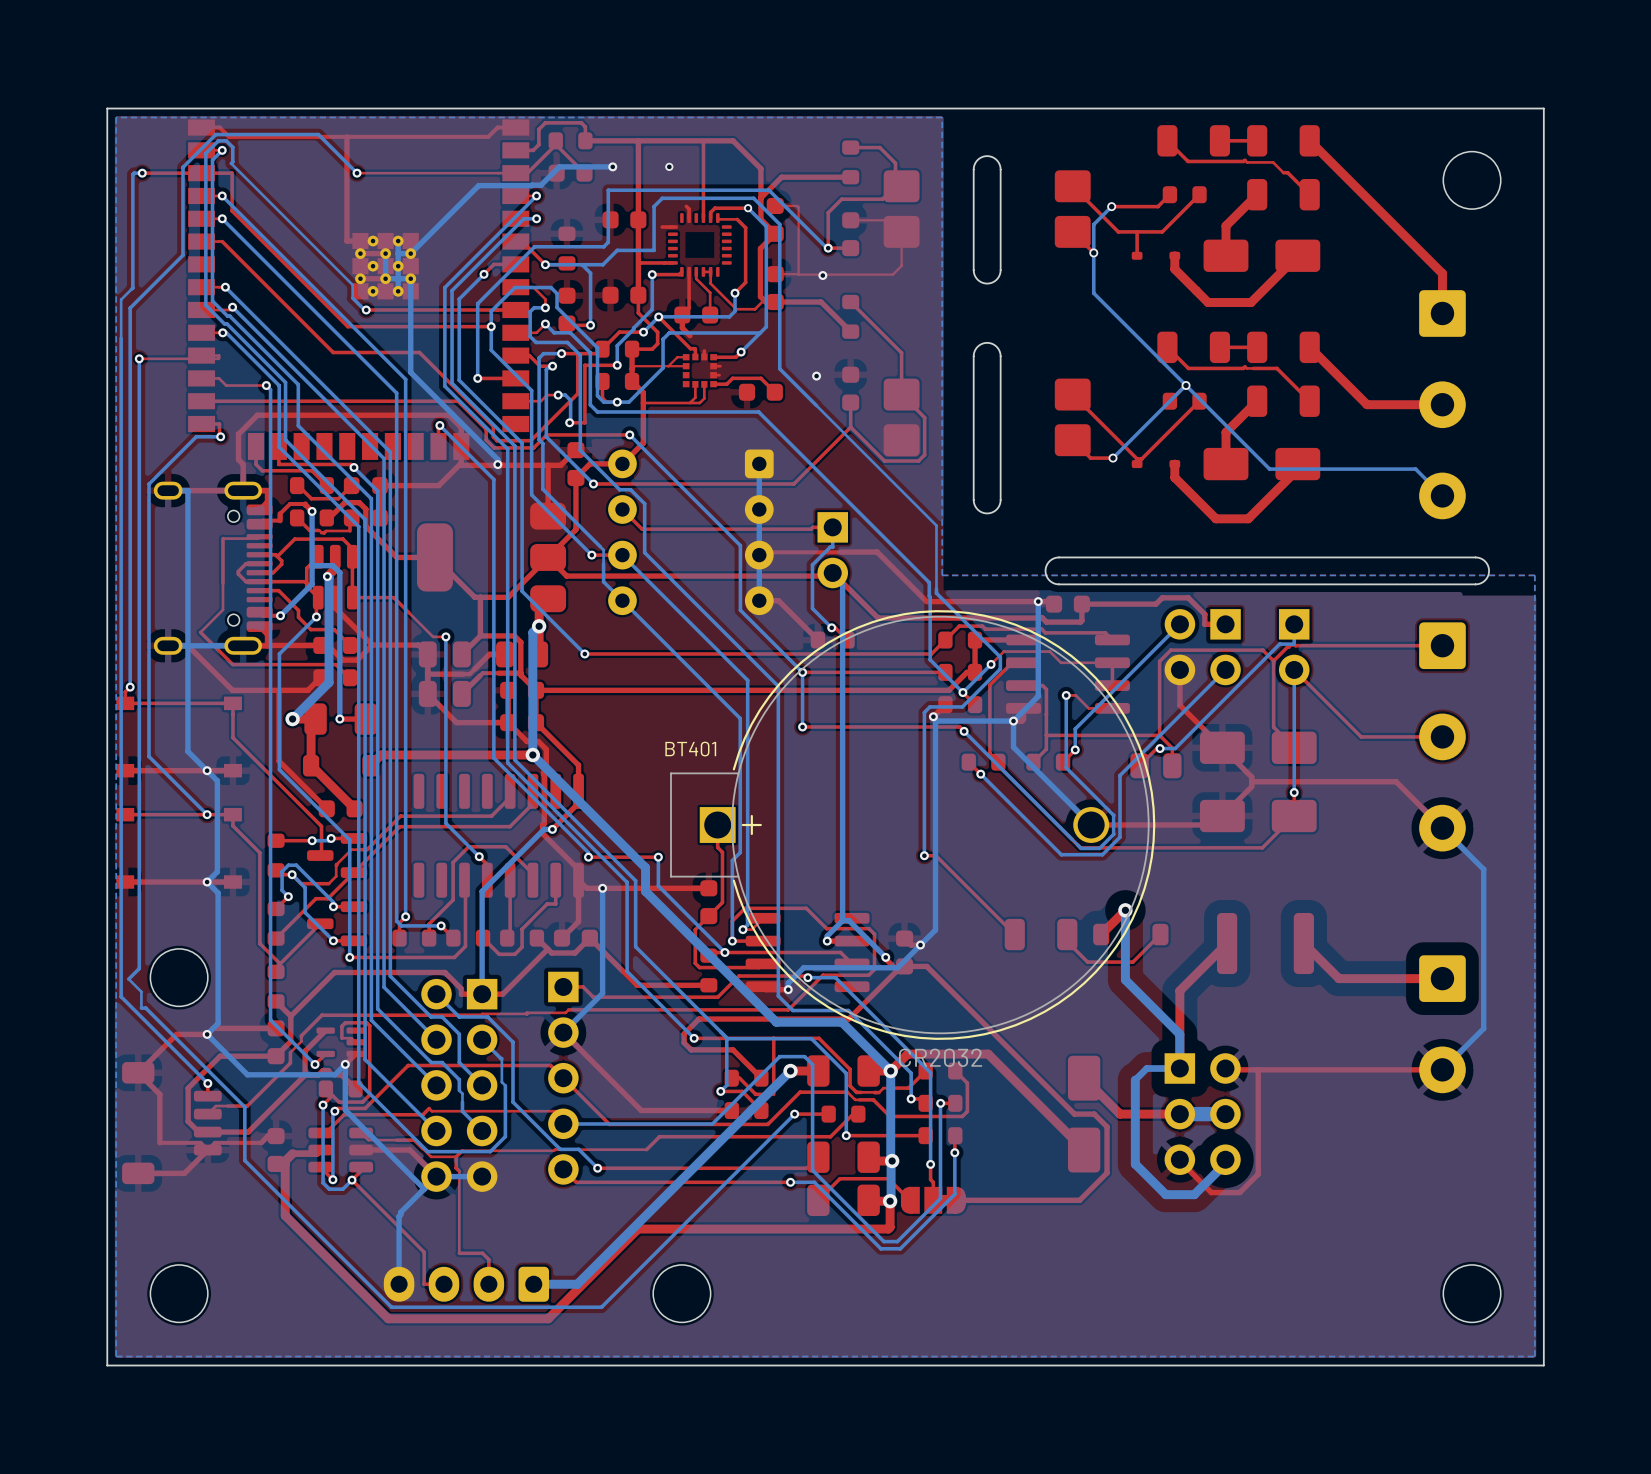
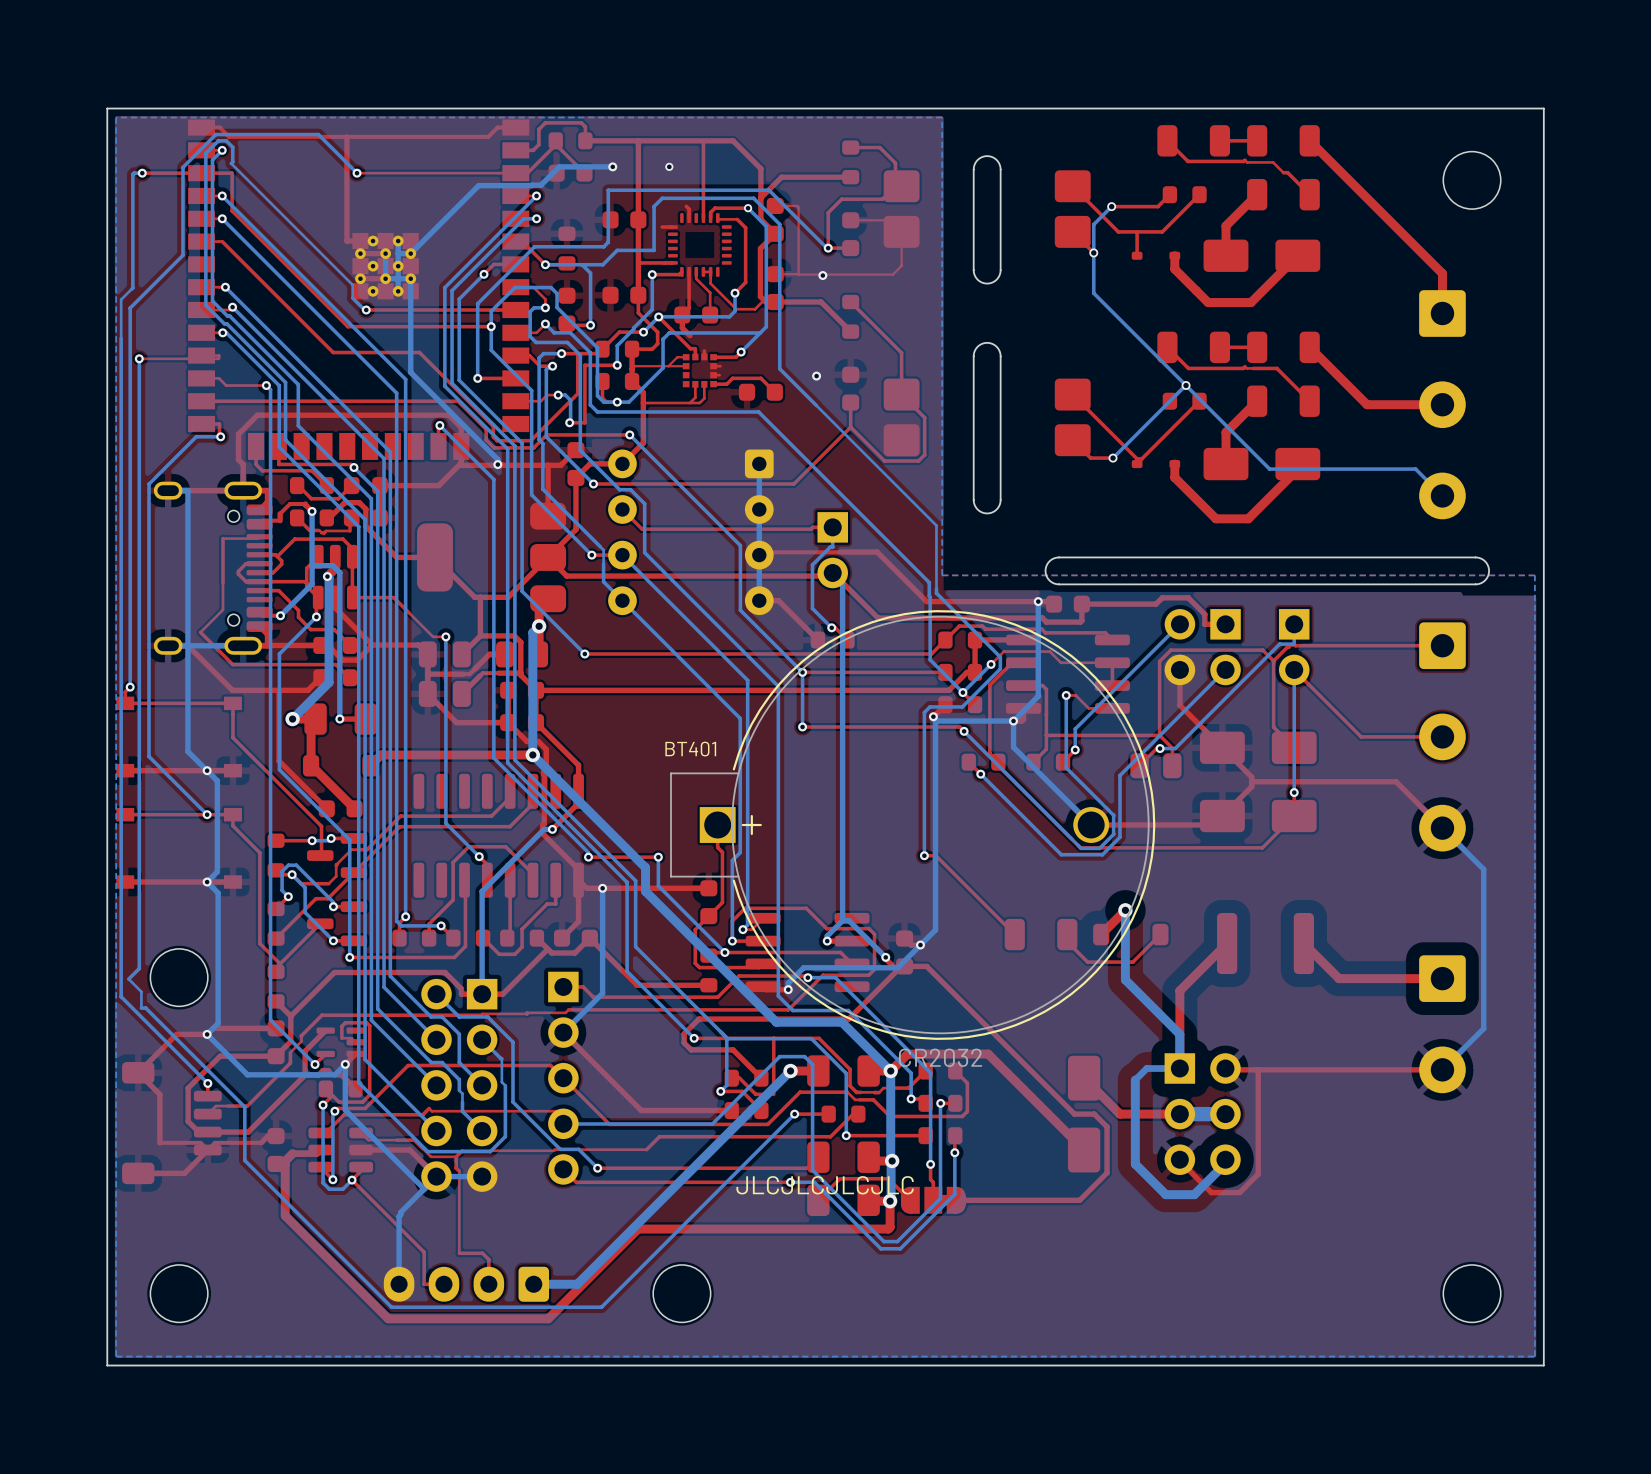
text: none -> JLCJLCJLCJLC (825, 1185)

